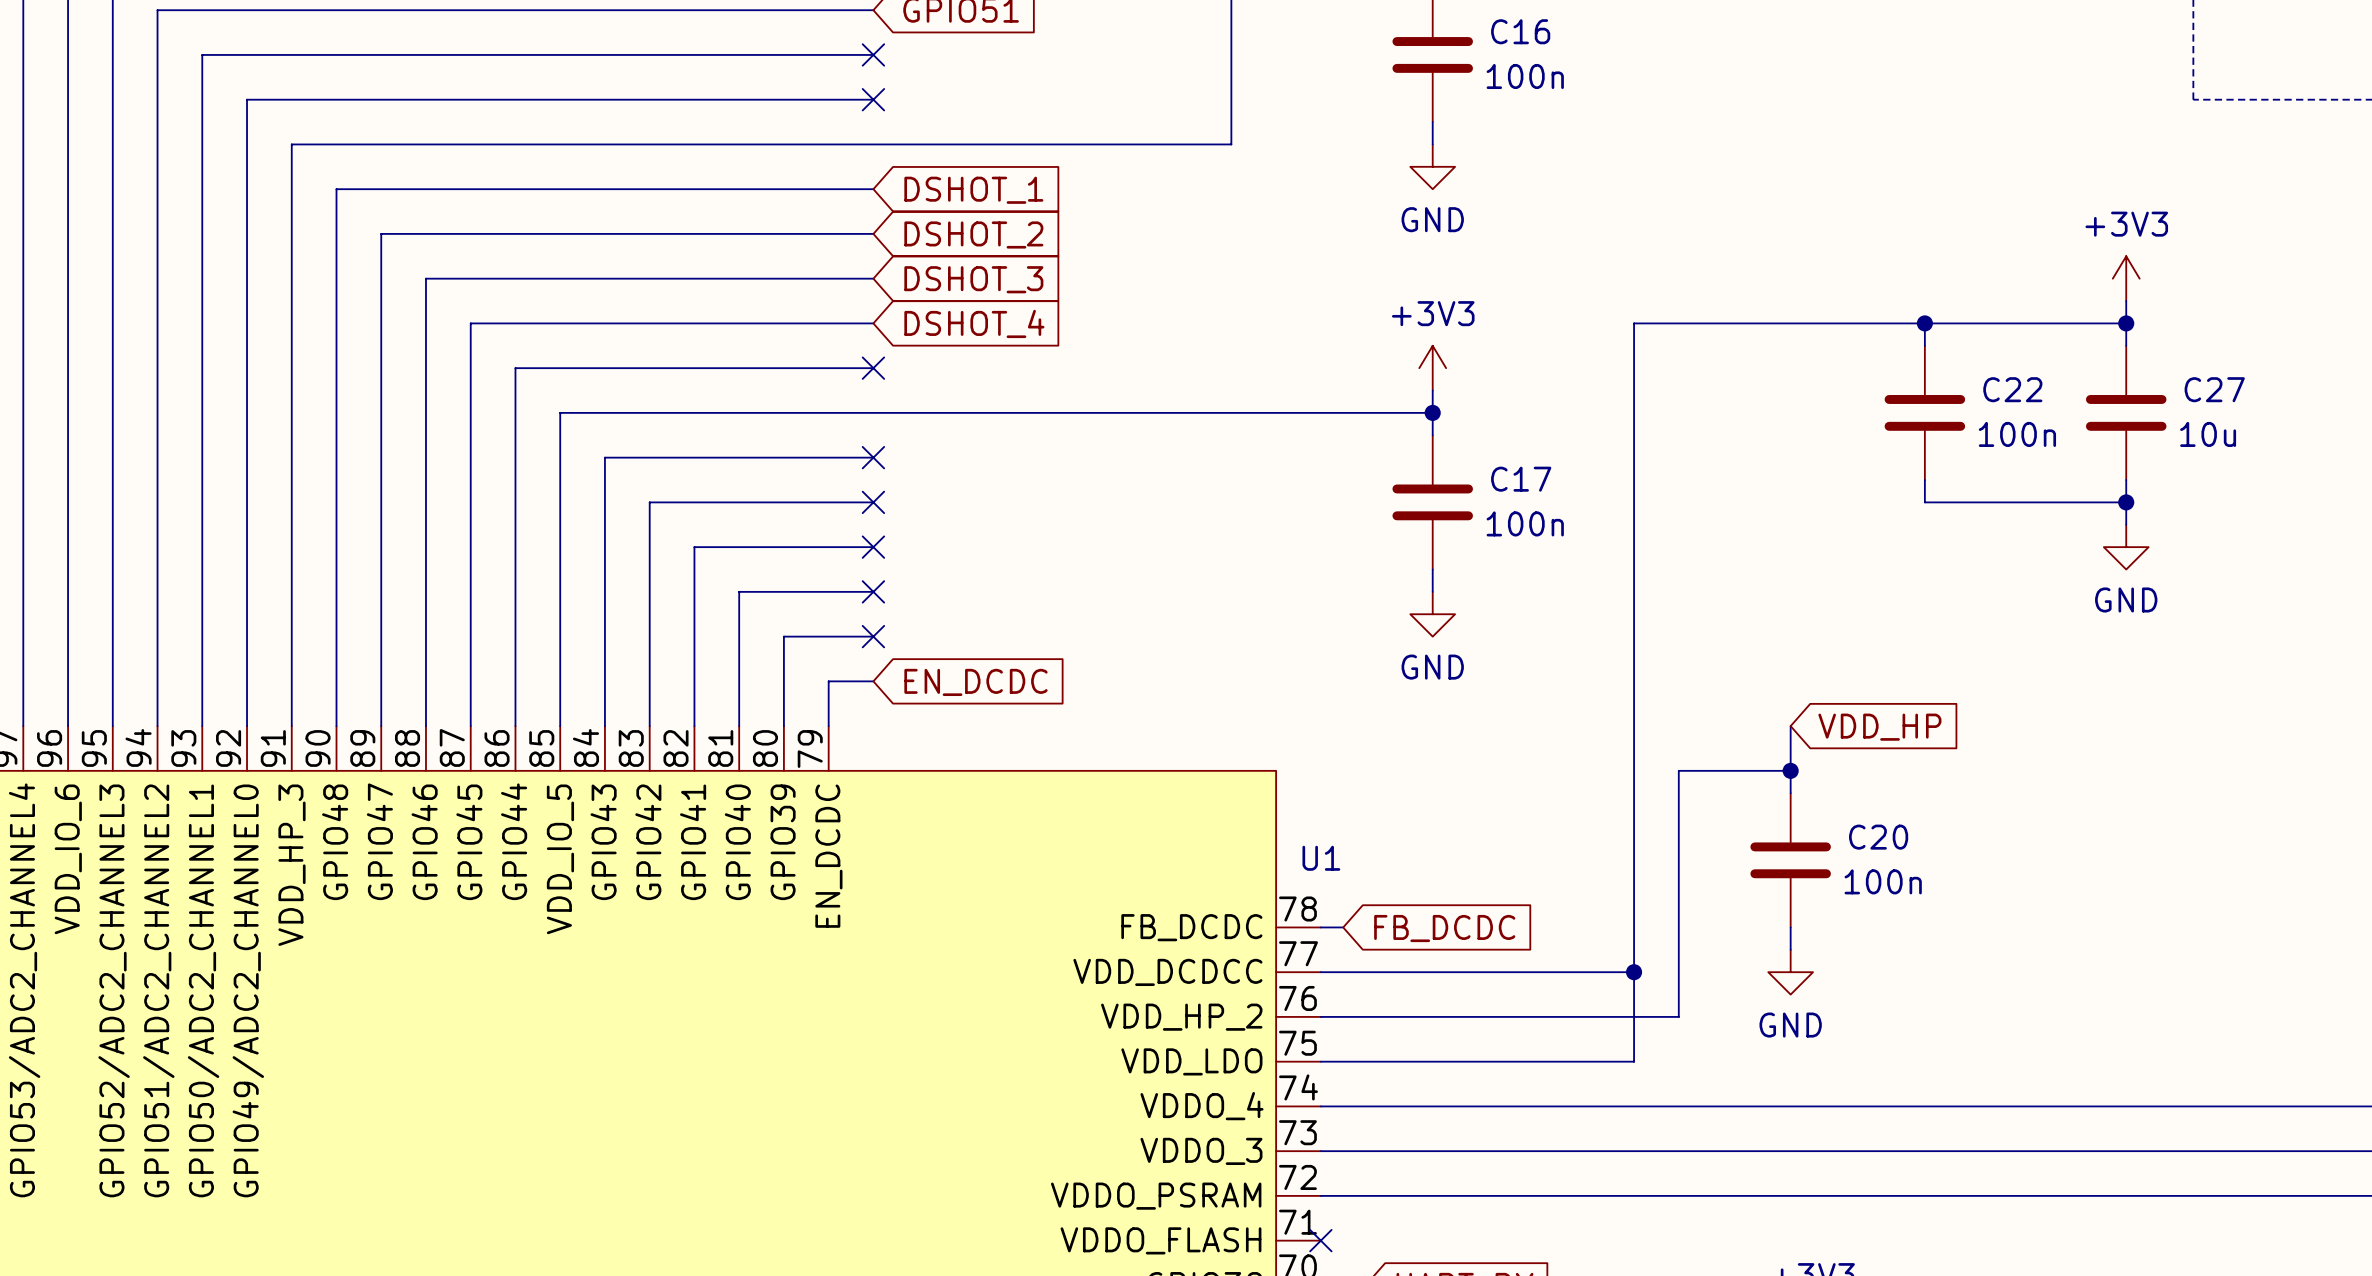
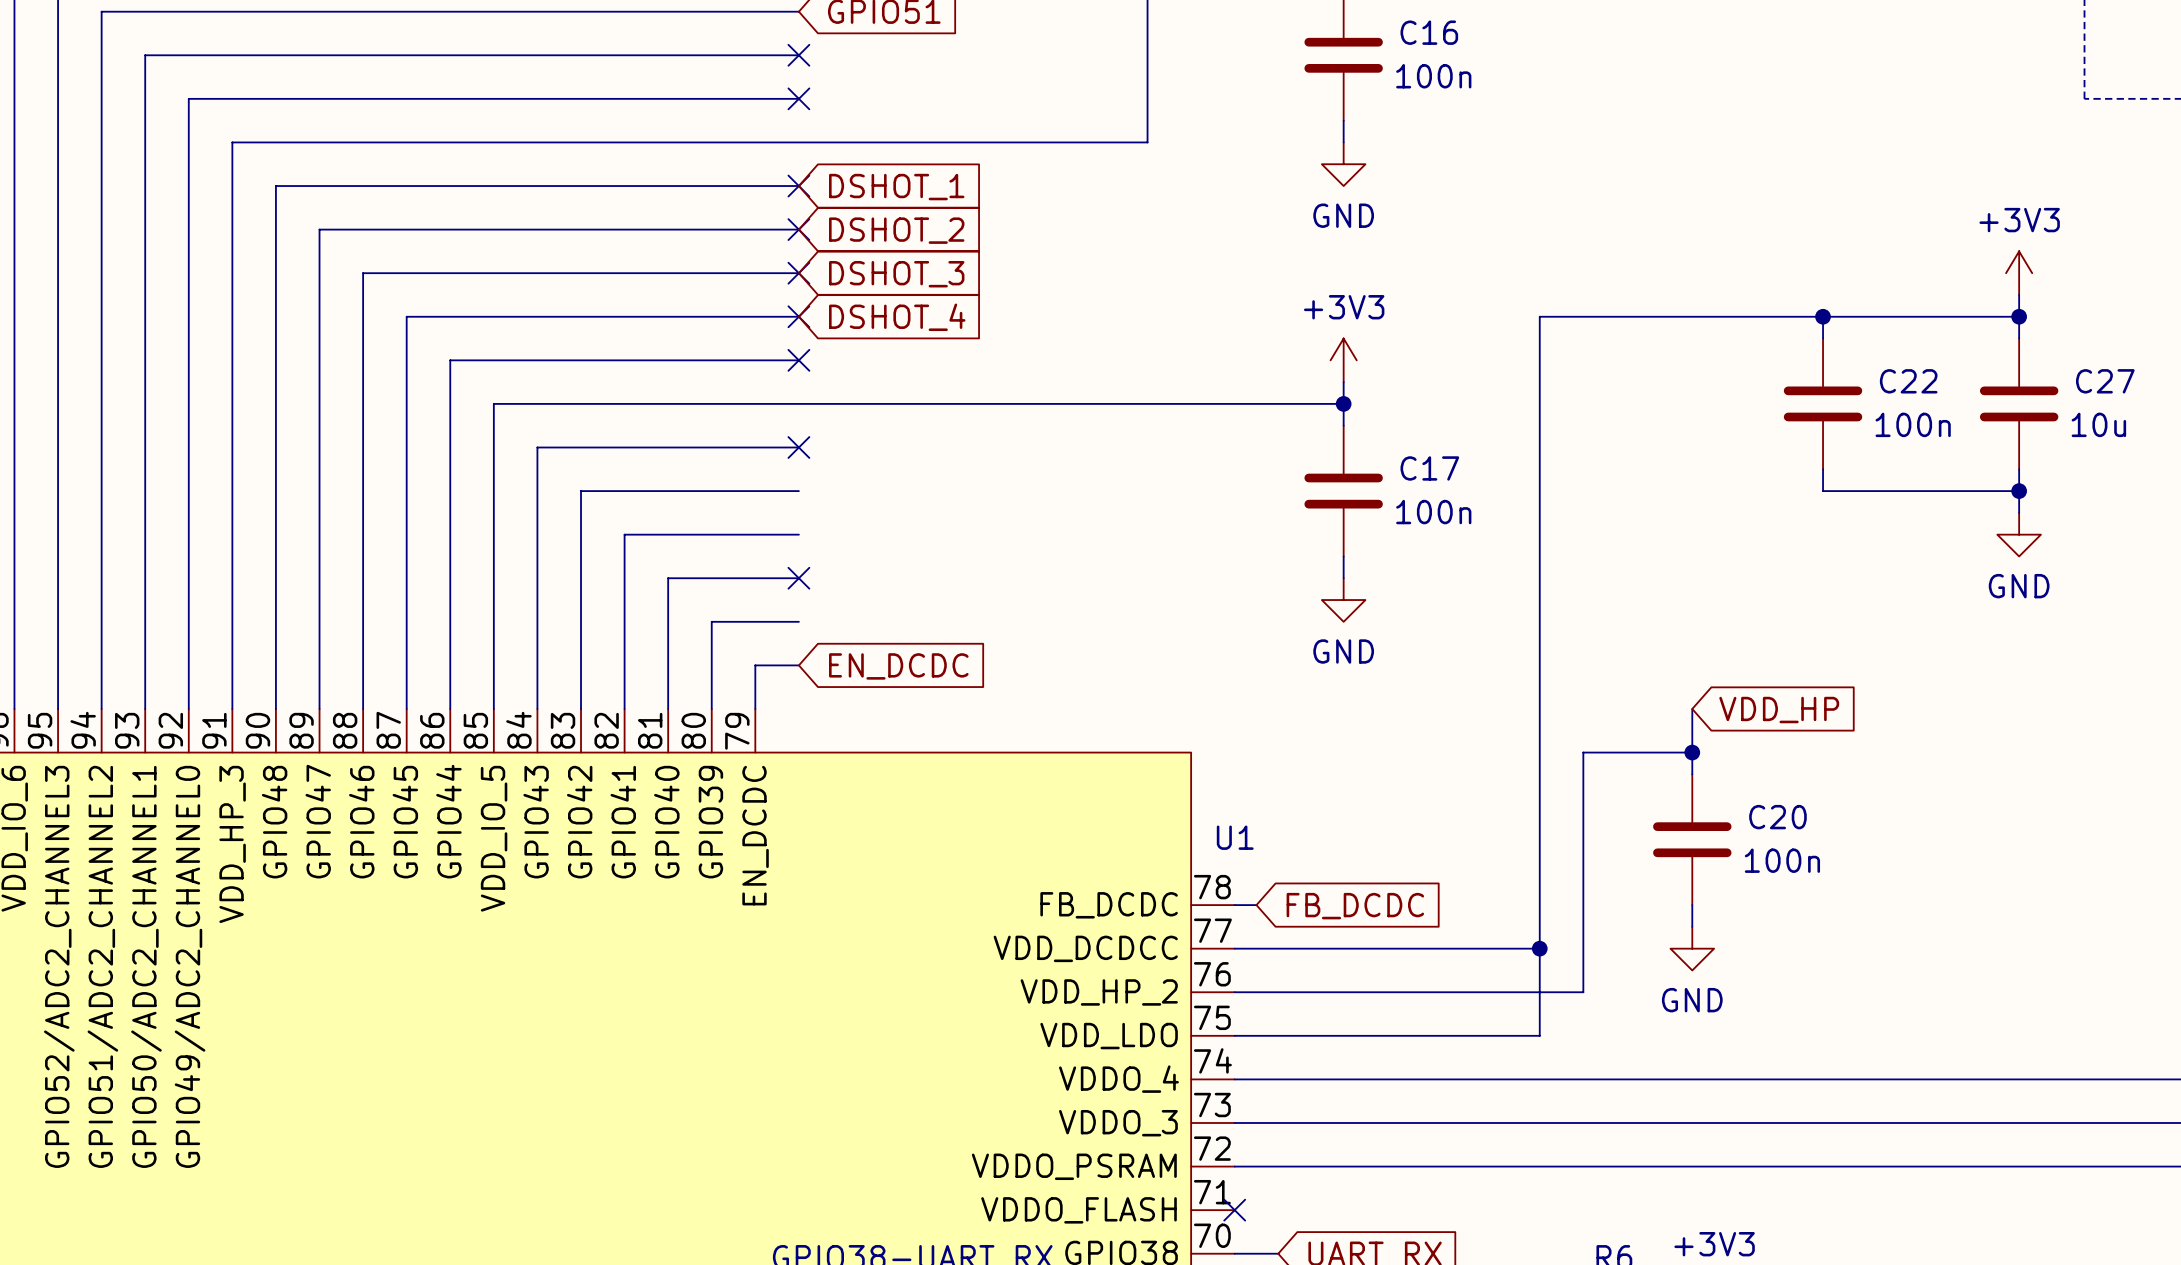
no-connect mark: none -> (798, 186)
no-connect mark: none -> (798, 229)
no-connect mark: none -> (798, 273)
no-connect mark: none -> (798, 316)
no-connect mark: (873, 502) -> none
no-connect mark: (873, 547) -> none
no-connect mark: (873, 636) -> none

